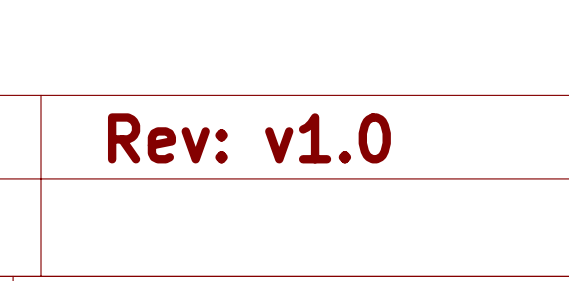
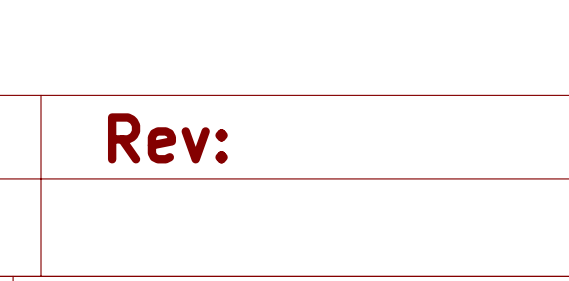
title block: Rev: v1.0 (249, 138) -> Rev: (167, 138)

